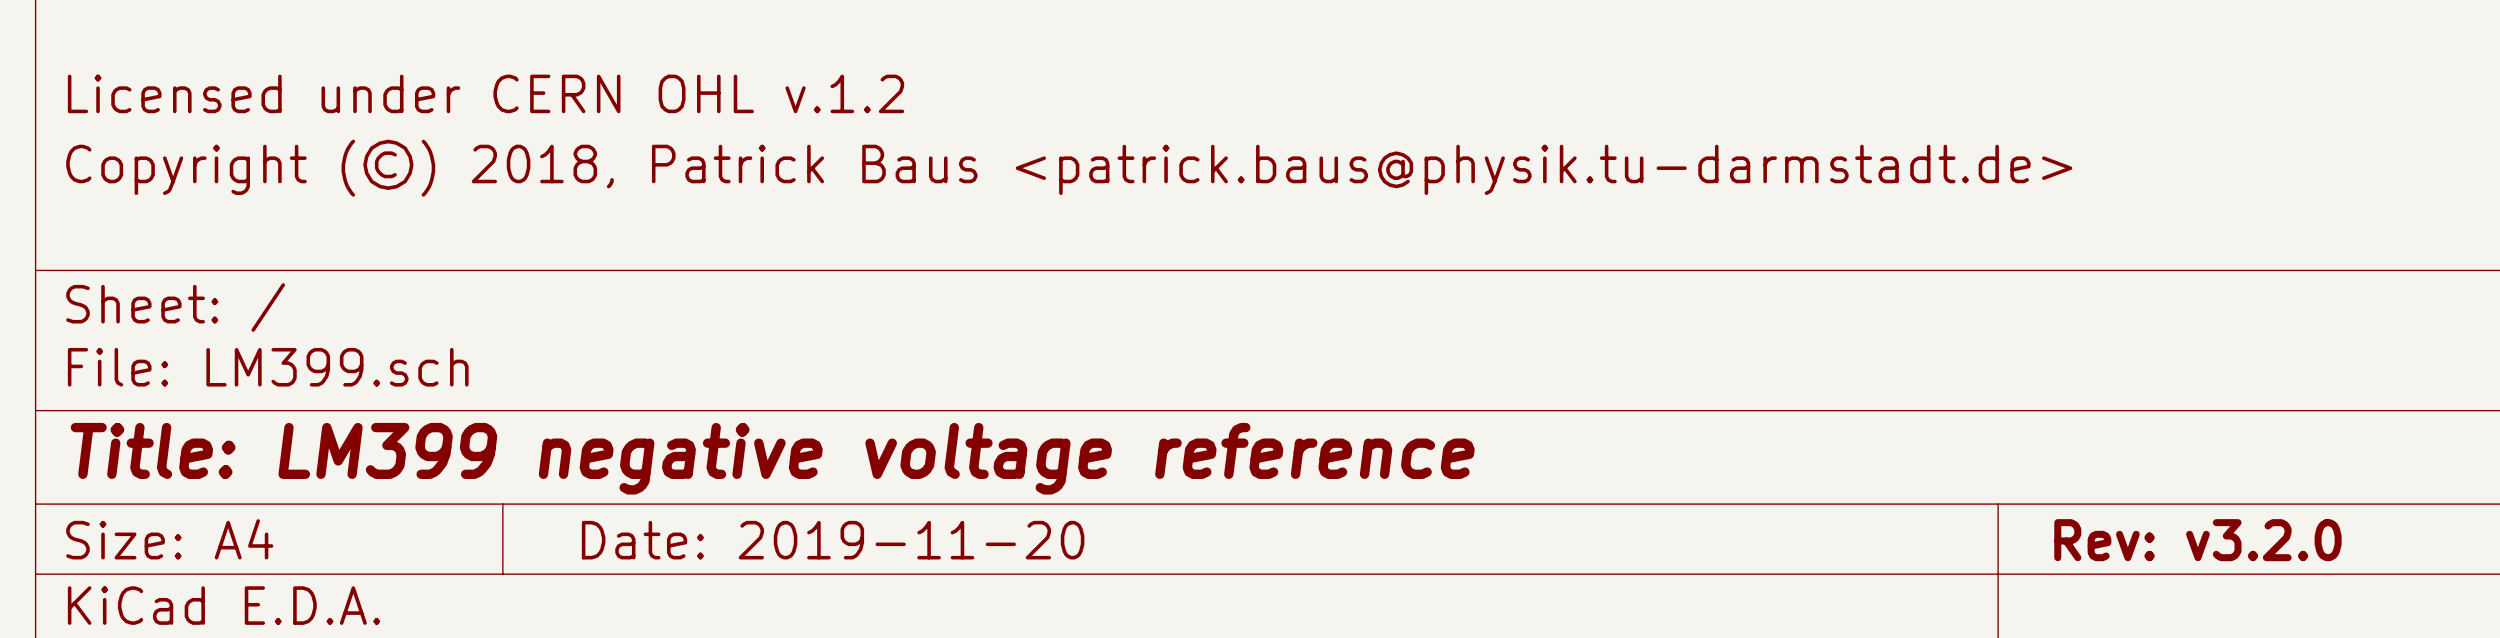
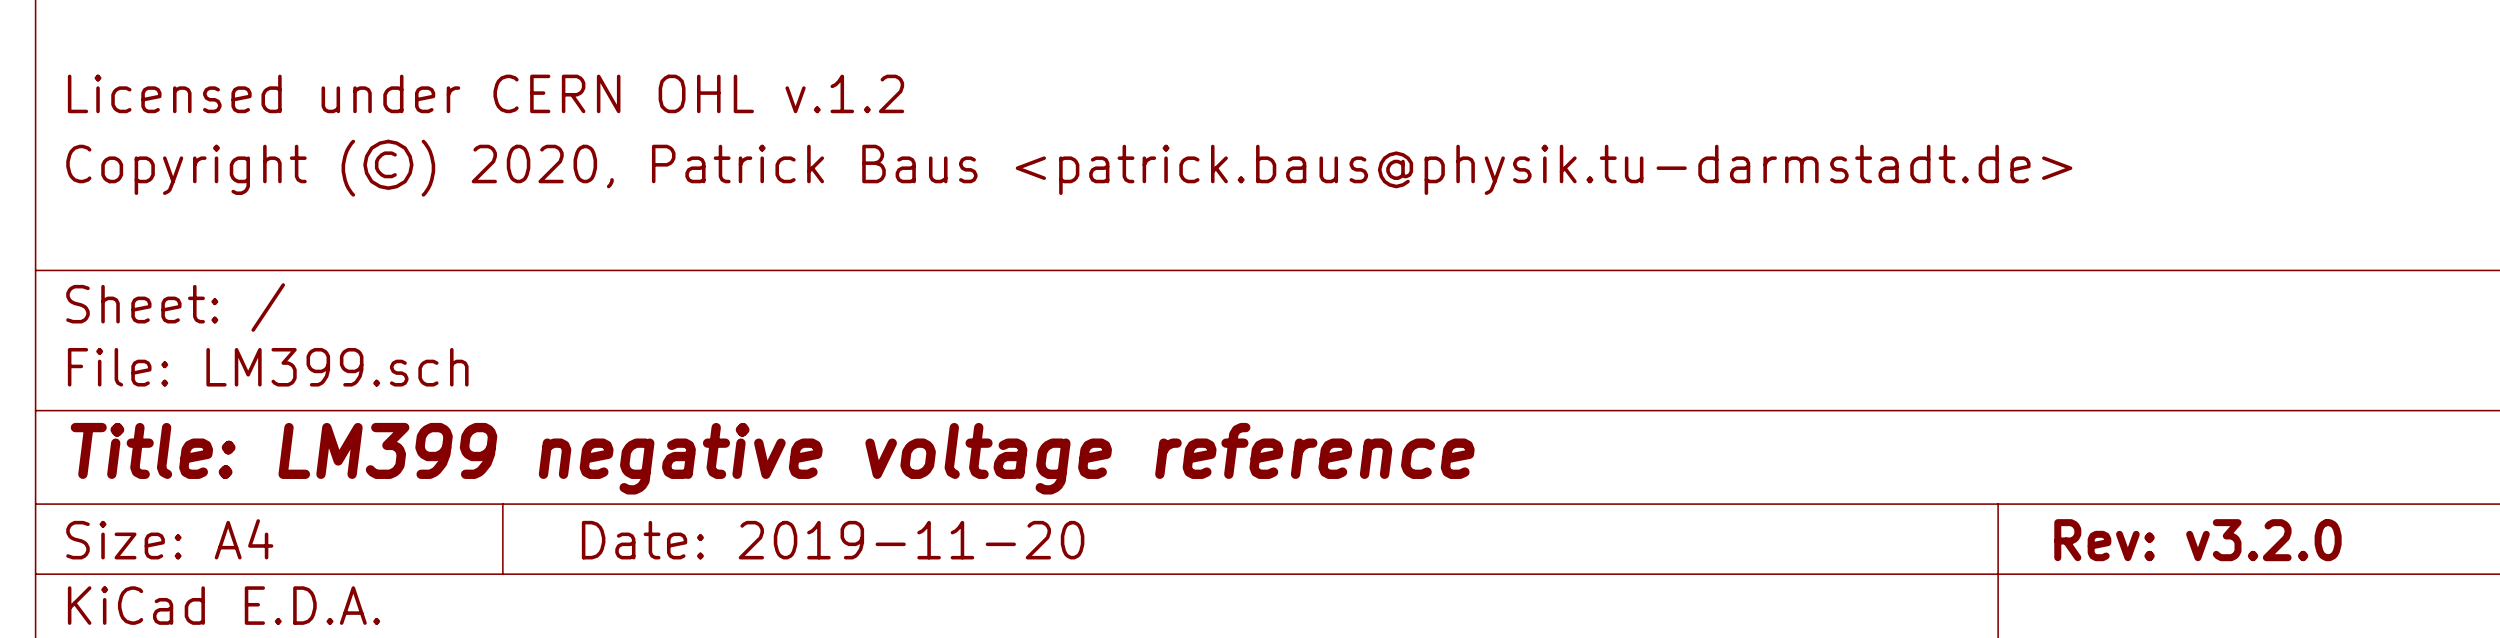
title block: Copyright (©) 2018, Patrick Baus <patrick.baus@physik.tu-darmstadt.de> (1069, 168) -> Copyright (©) 2020, Patrick Baus <patrick.baus@physik.tu-darmstadt.de> (1069, 168)

